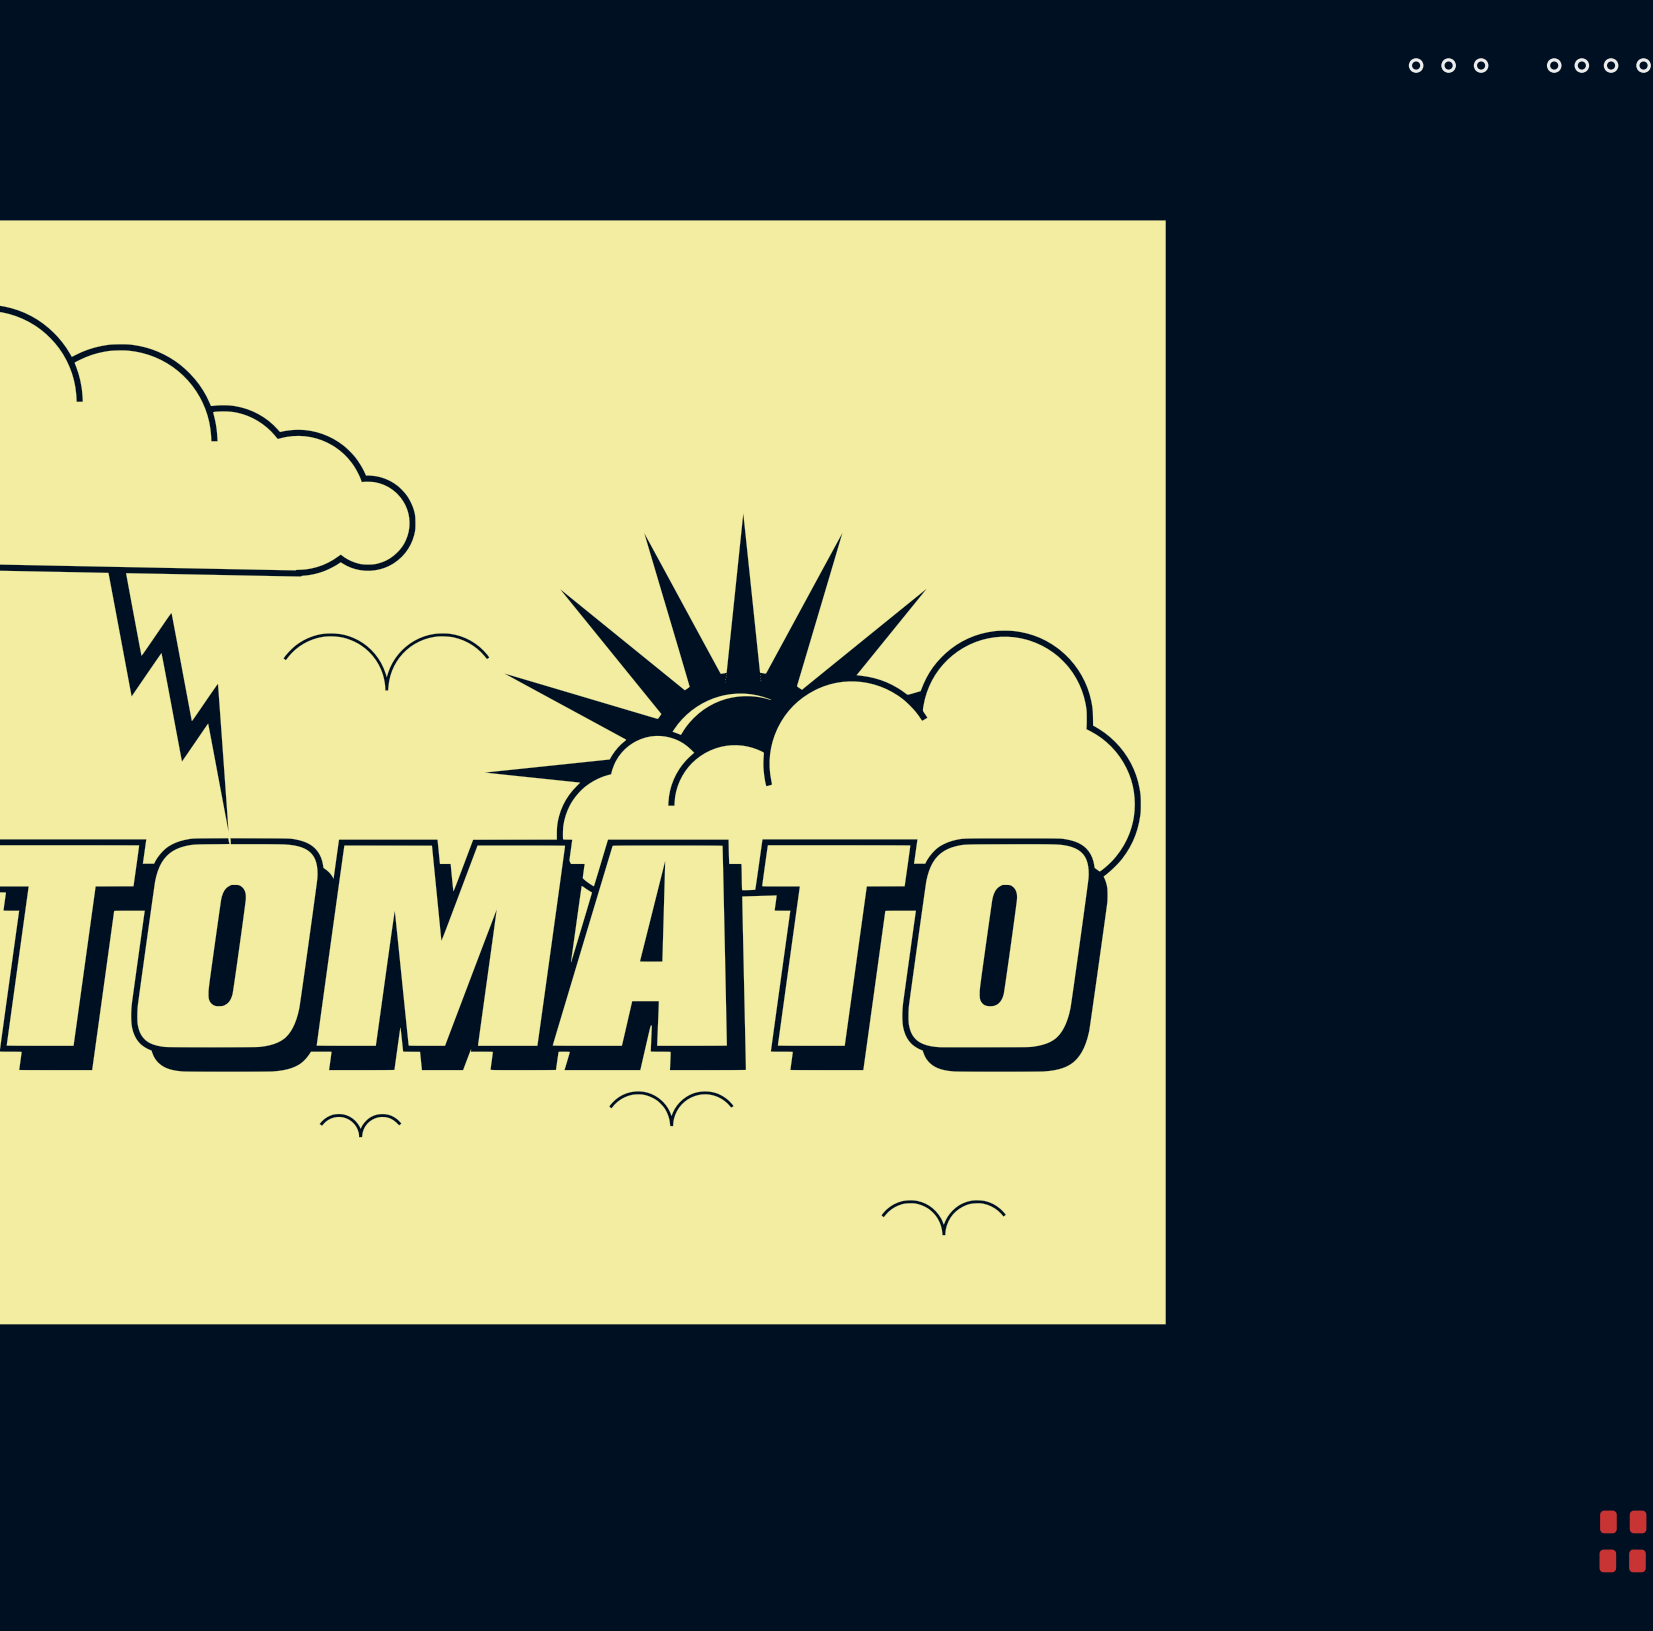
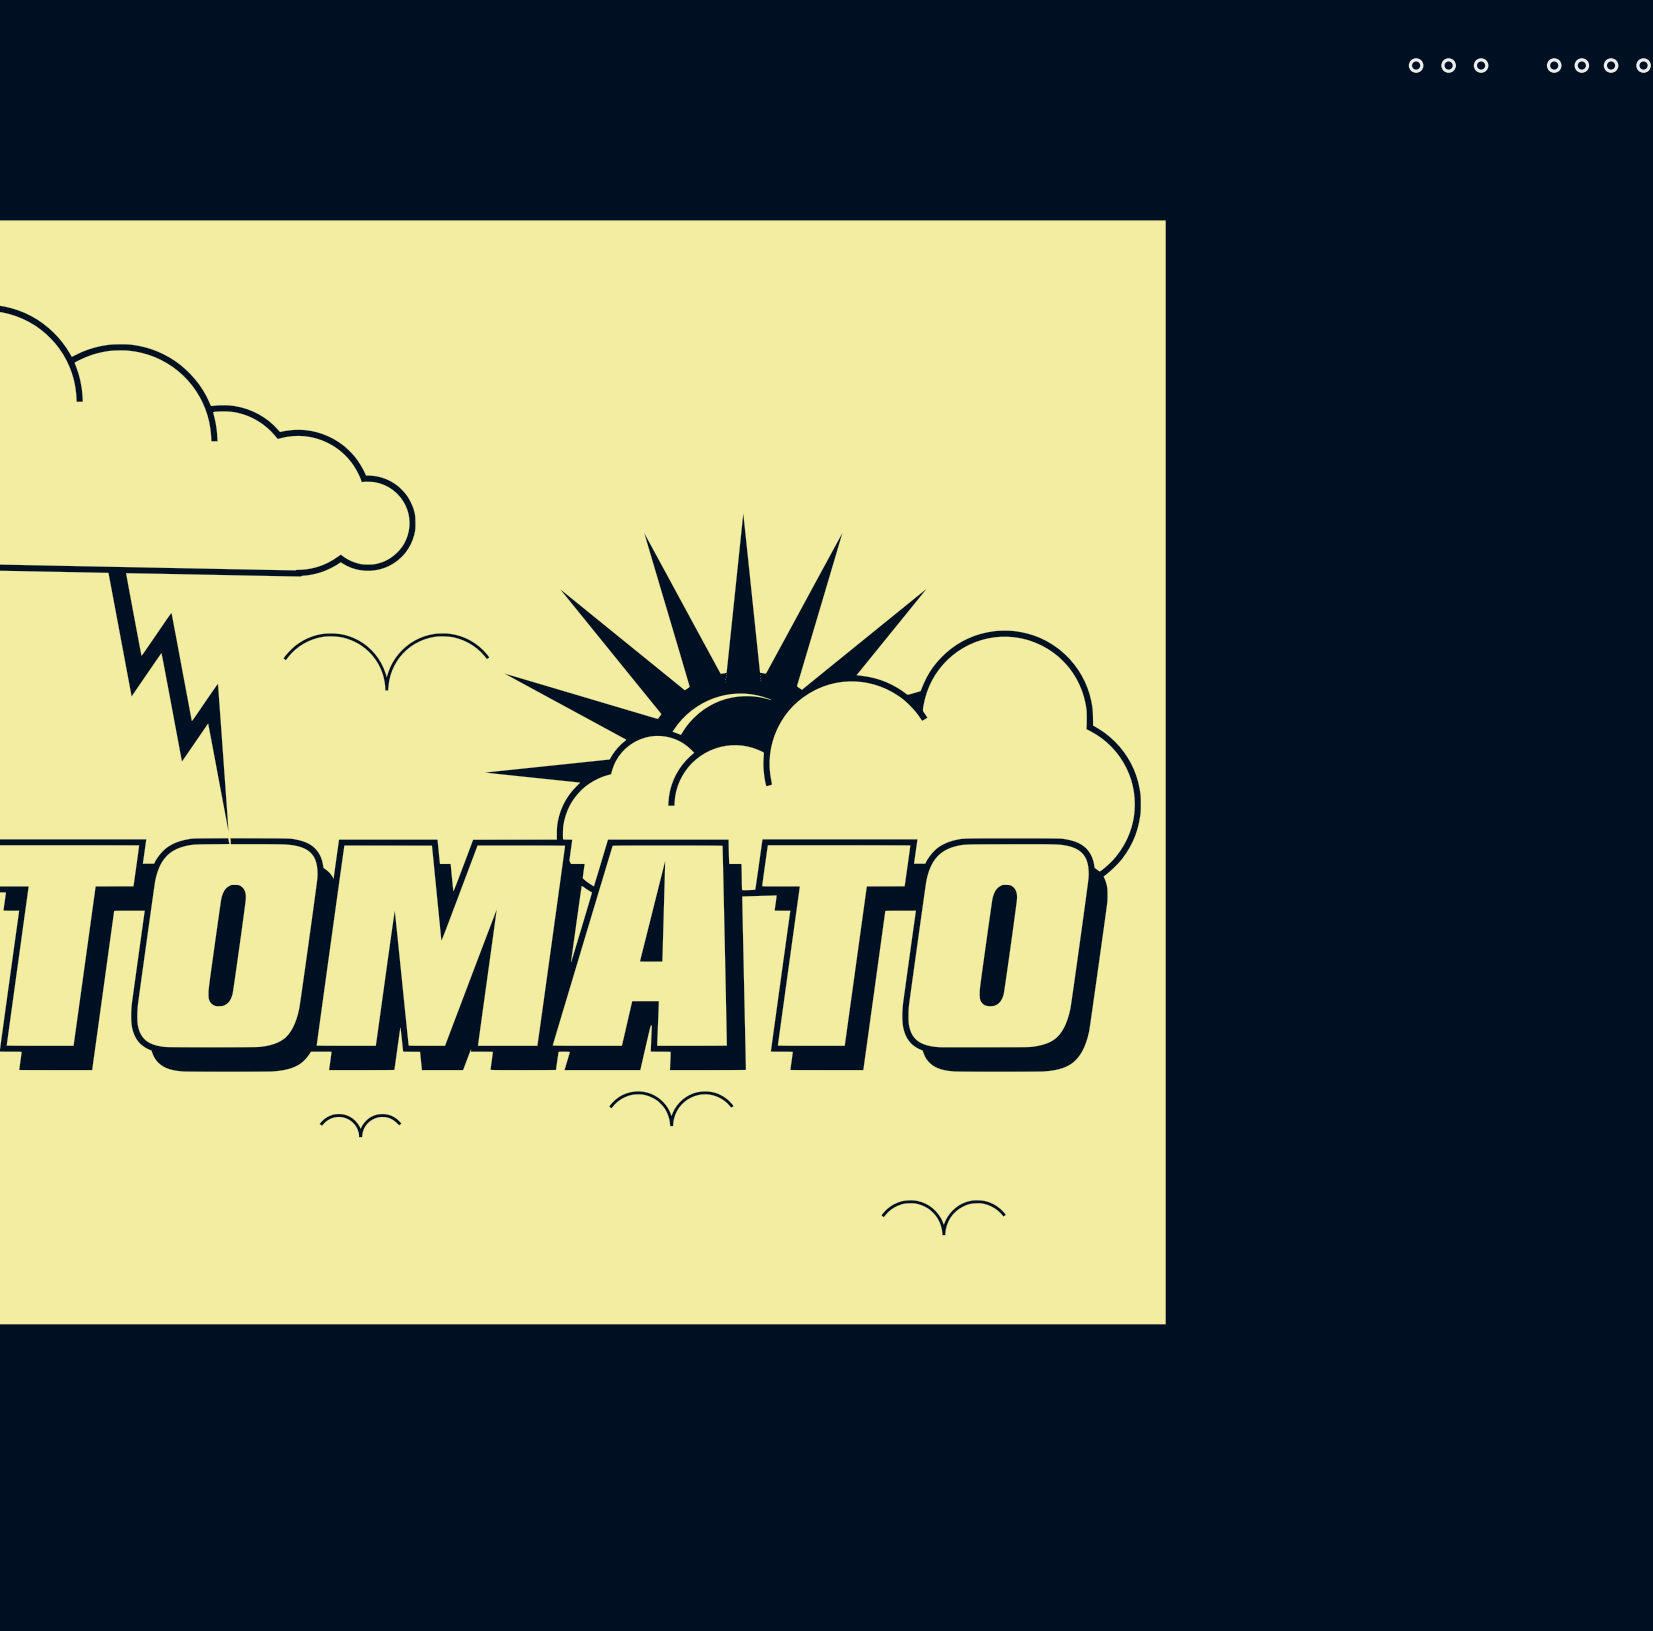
part: (1623, 1521) -> none
part: (1622, 1560) -> none

